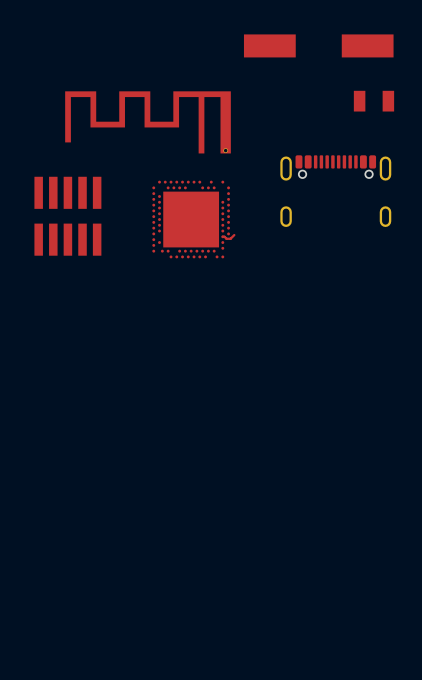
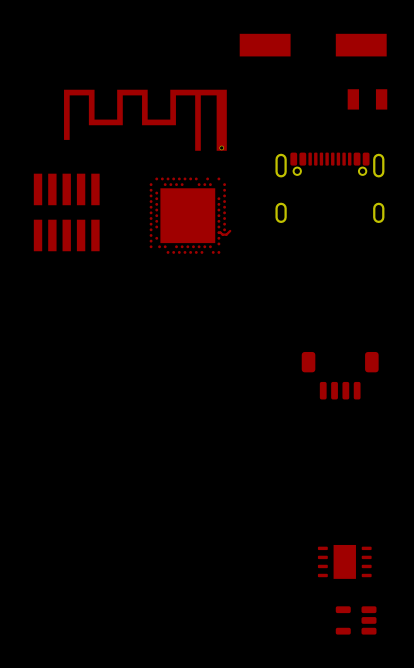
part: none -> (340, 375)
part: none -> (344, 561)
part: none -> (356, 620)

